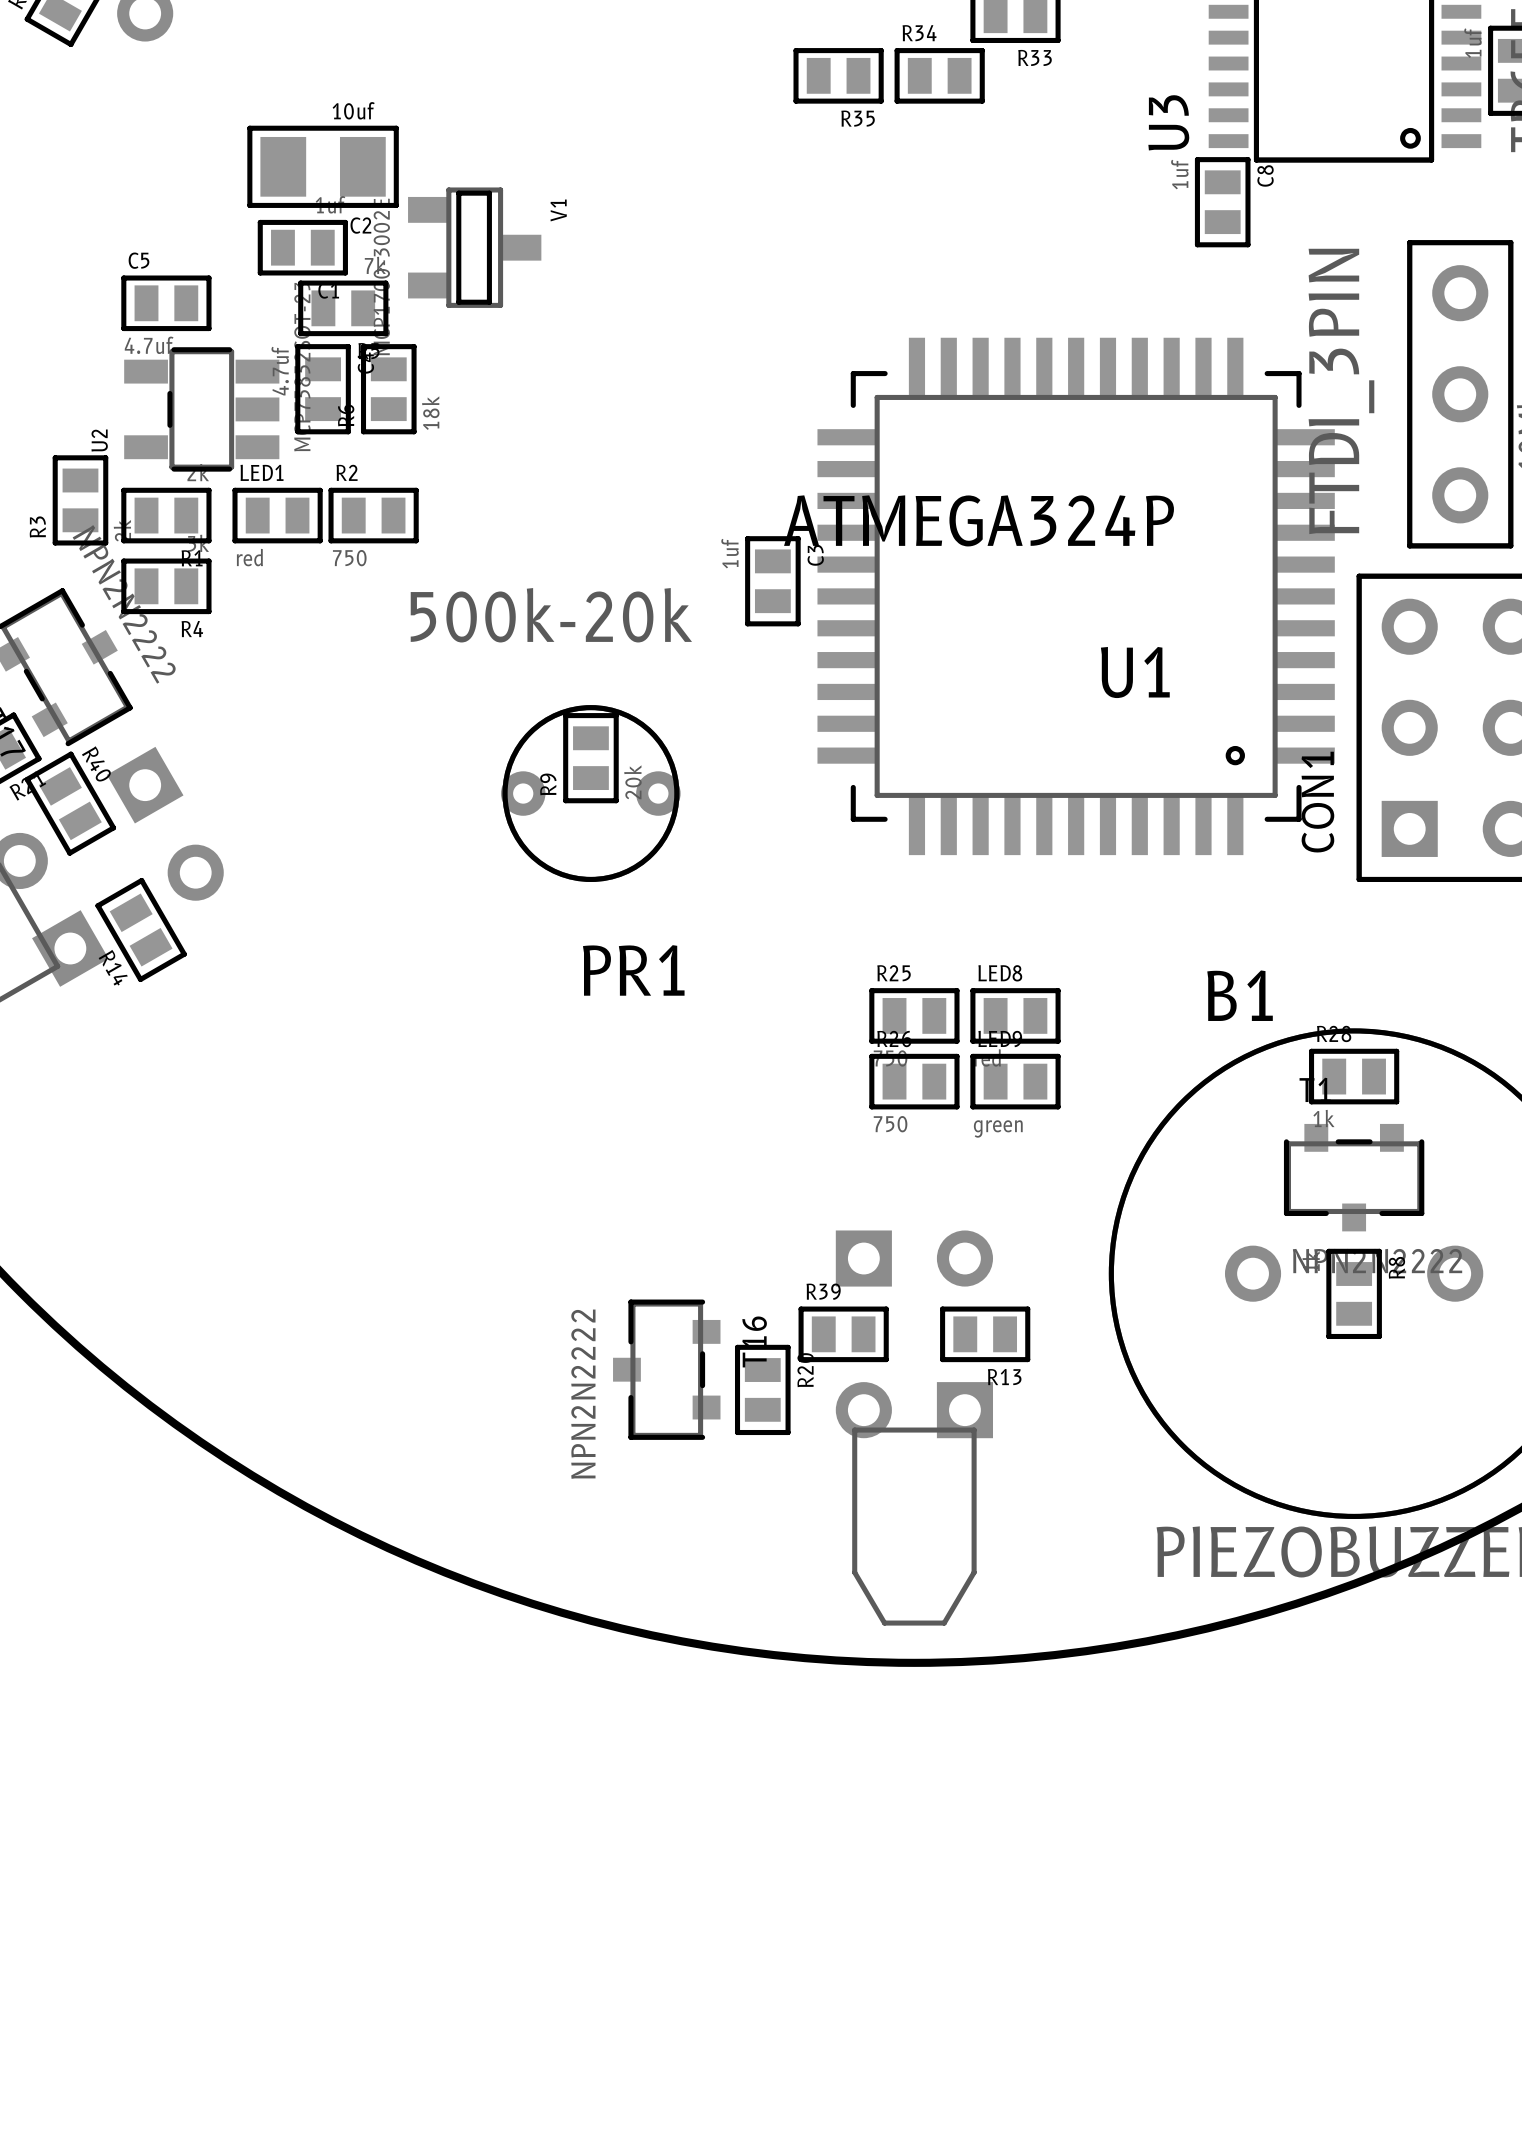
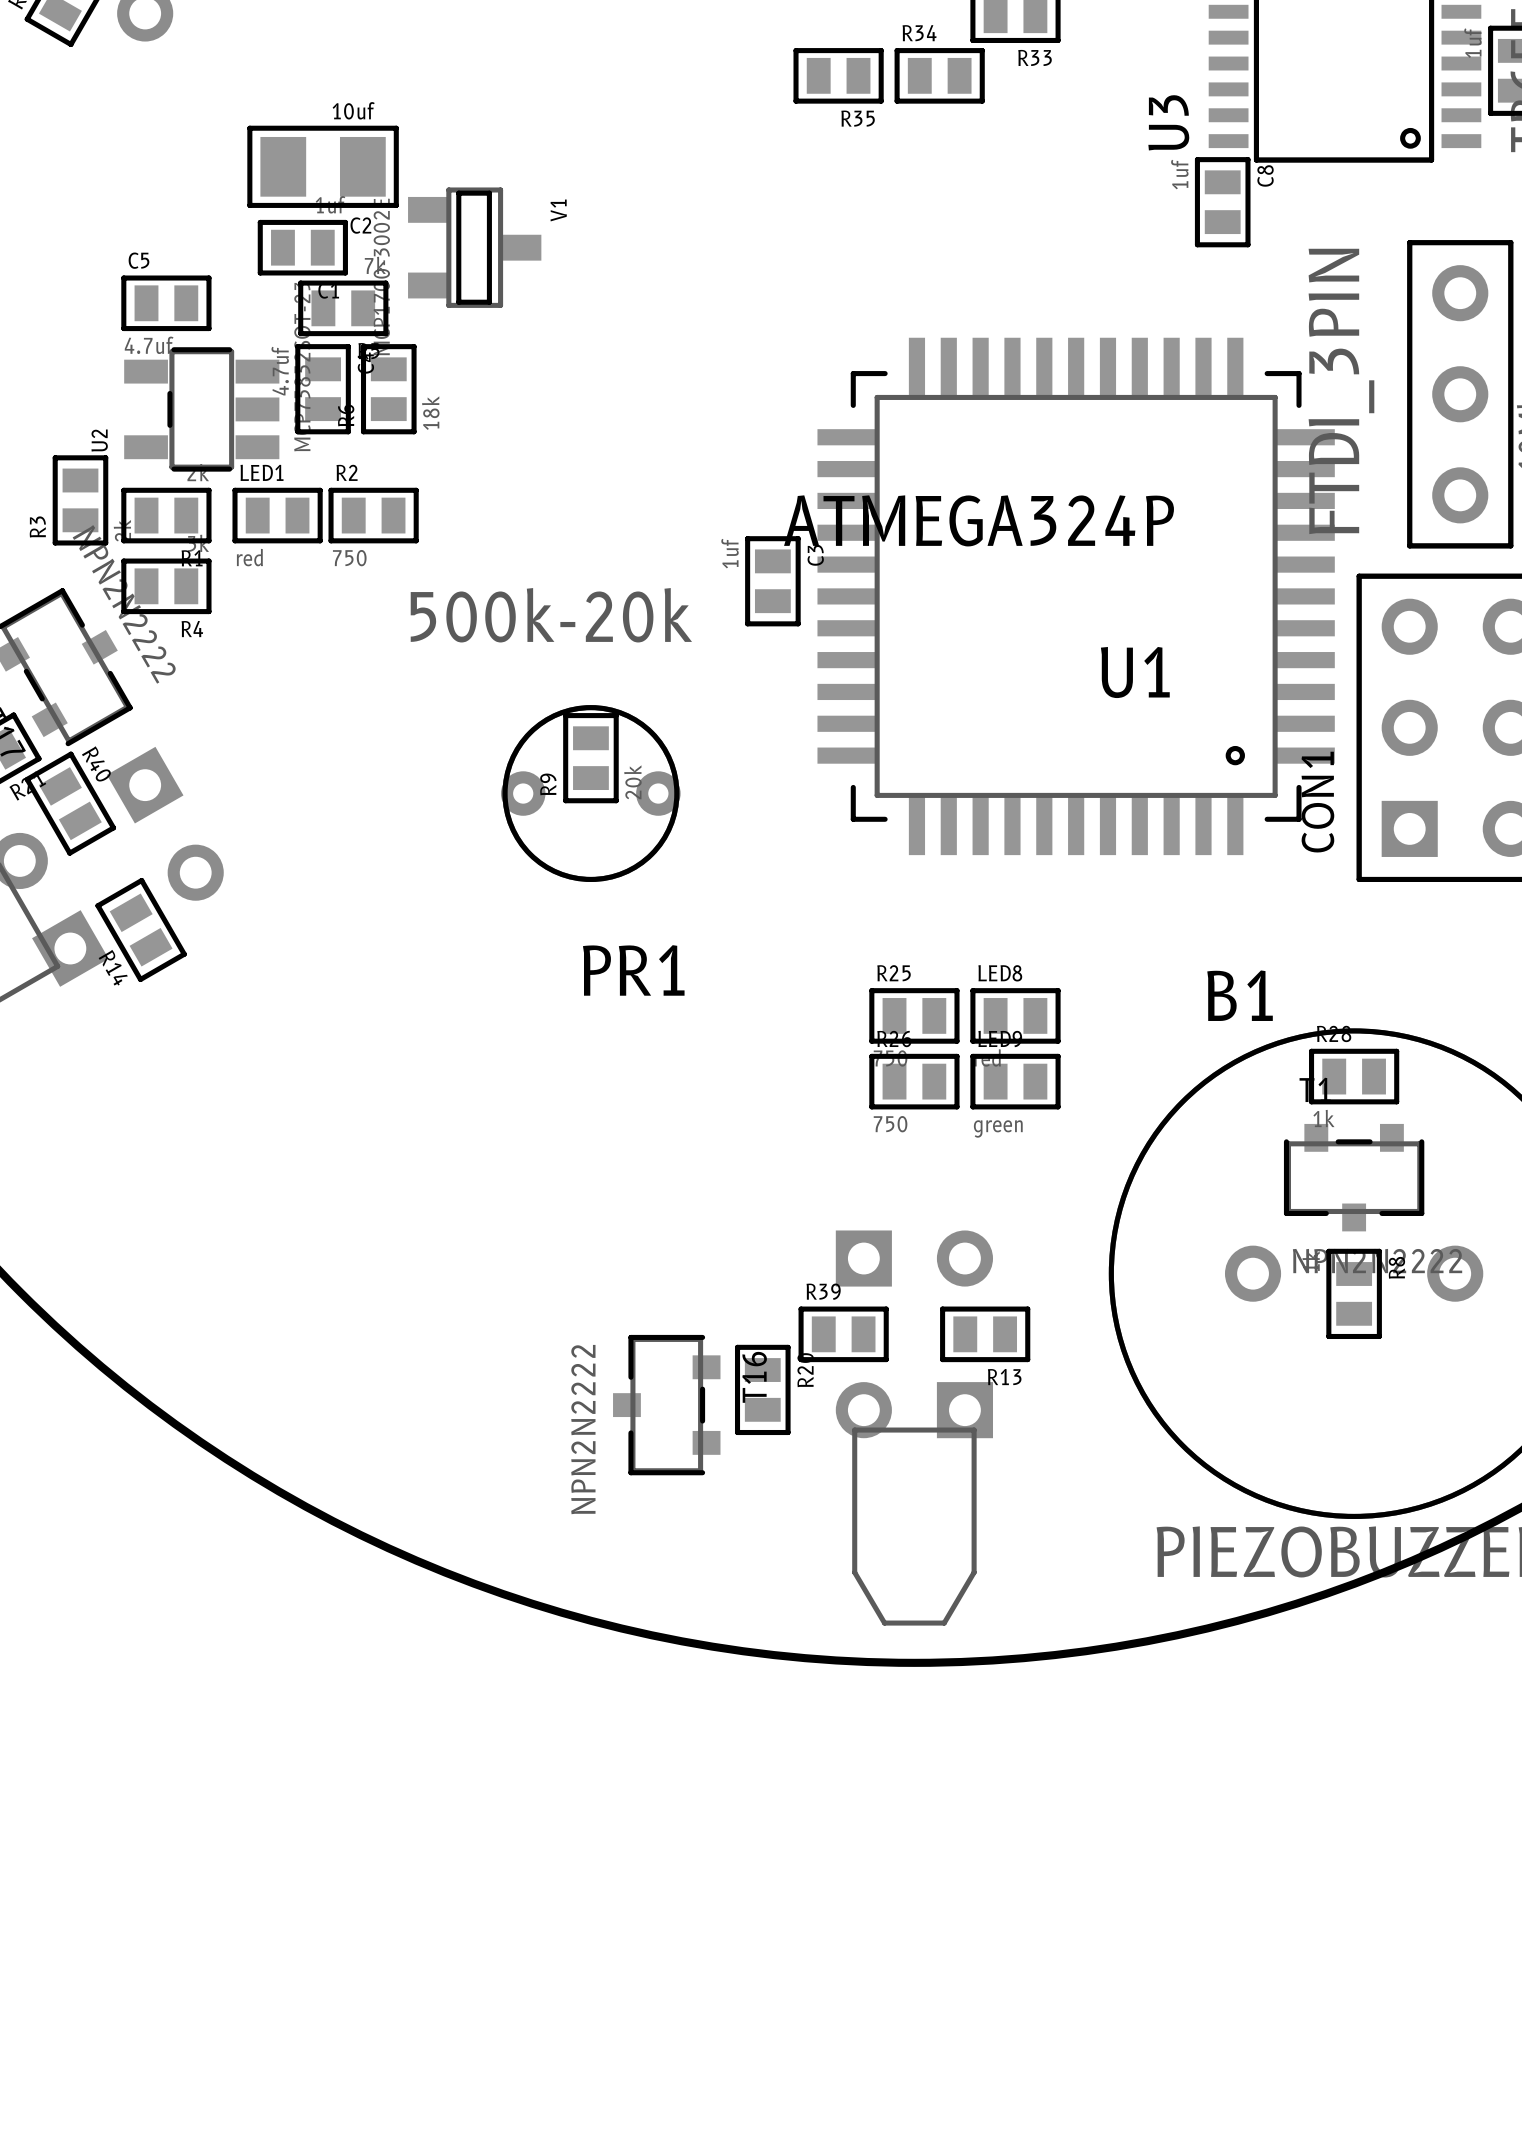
T16 position: (666, 1369) -> (666, 1405)

